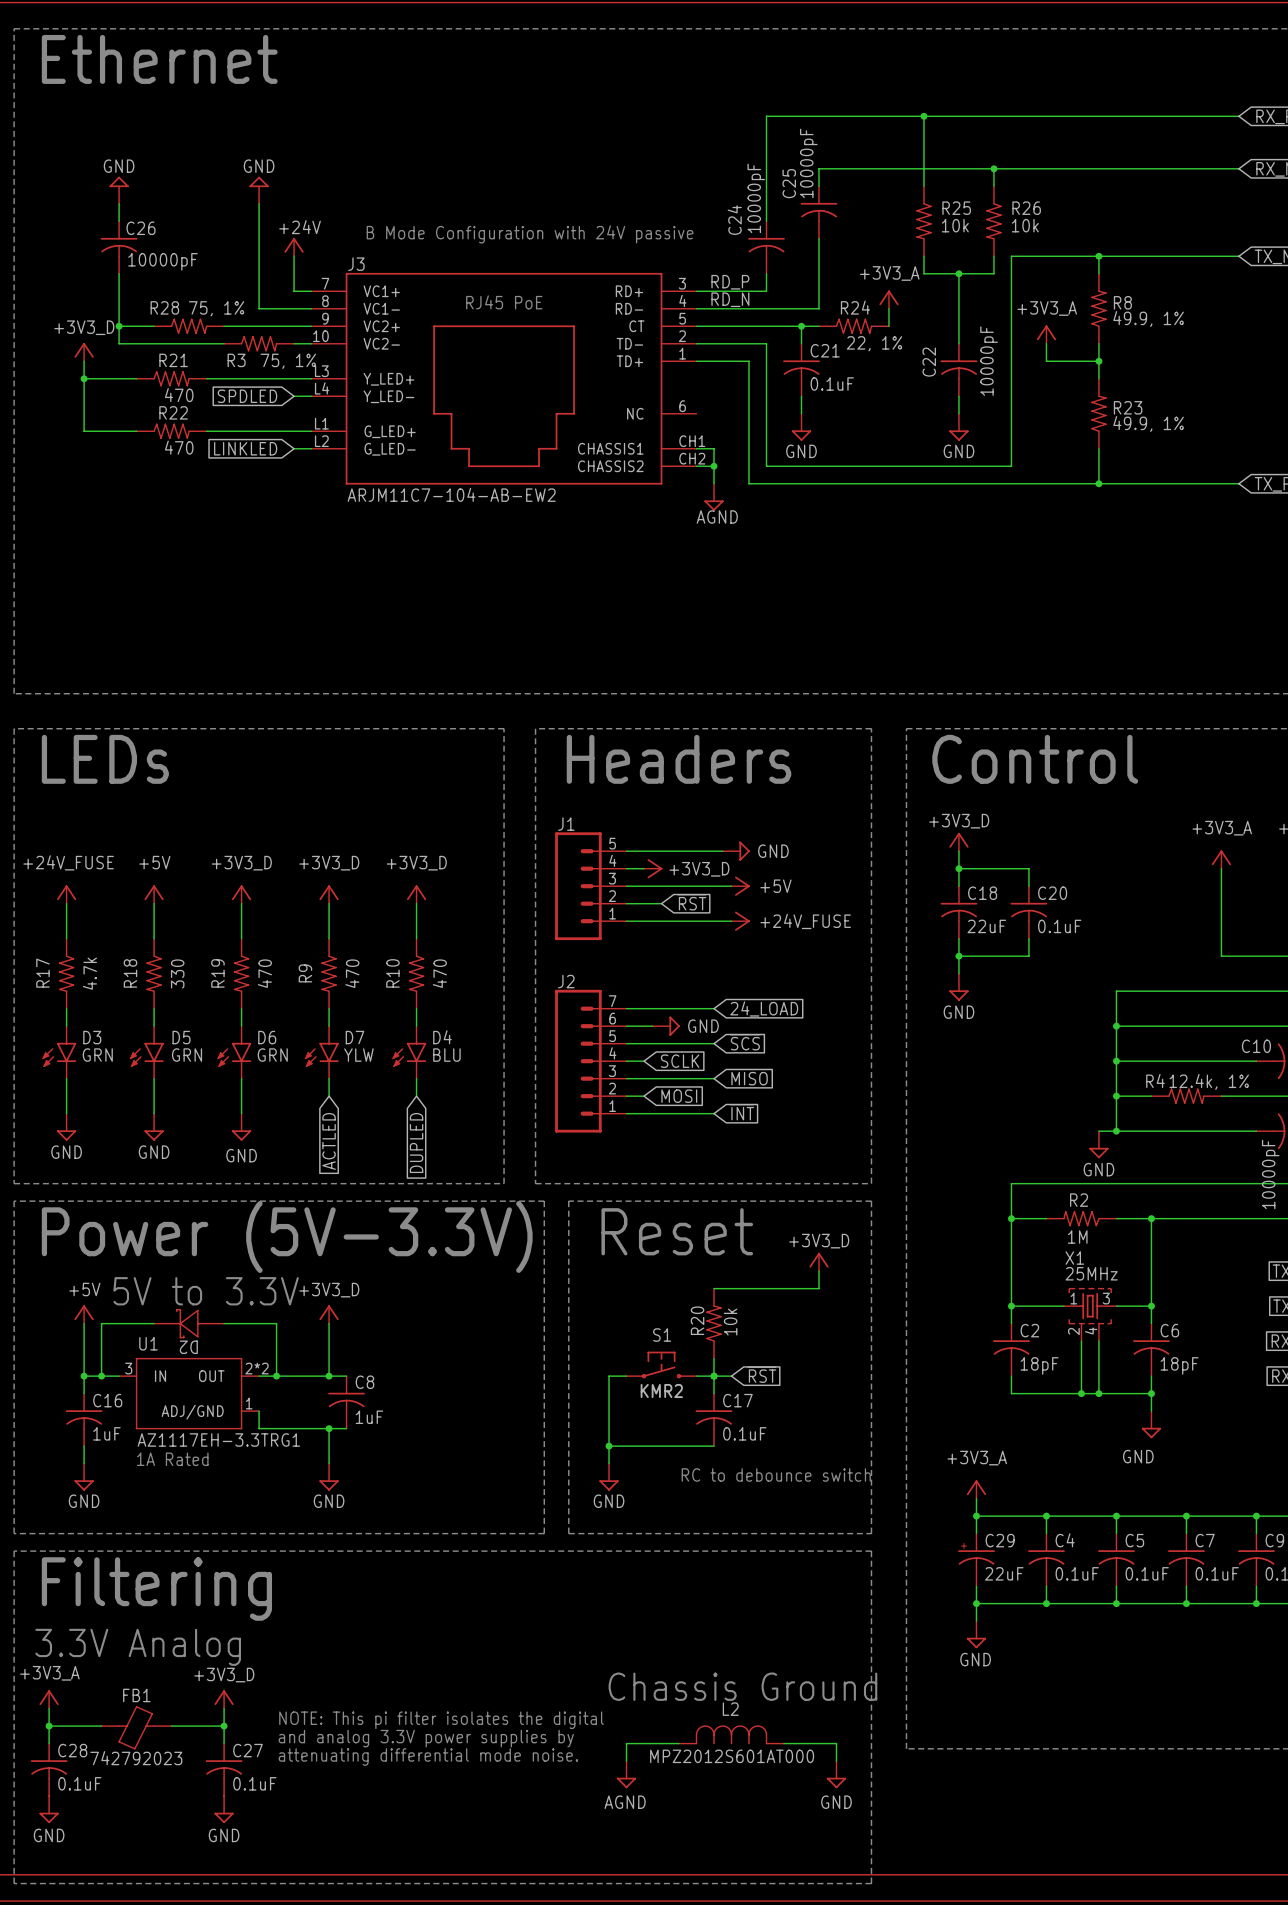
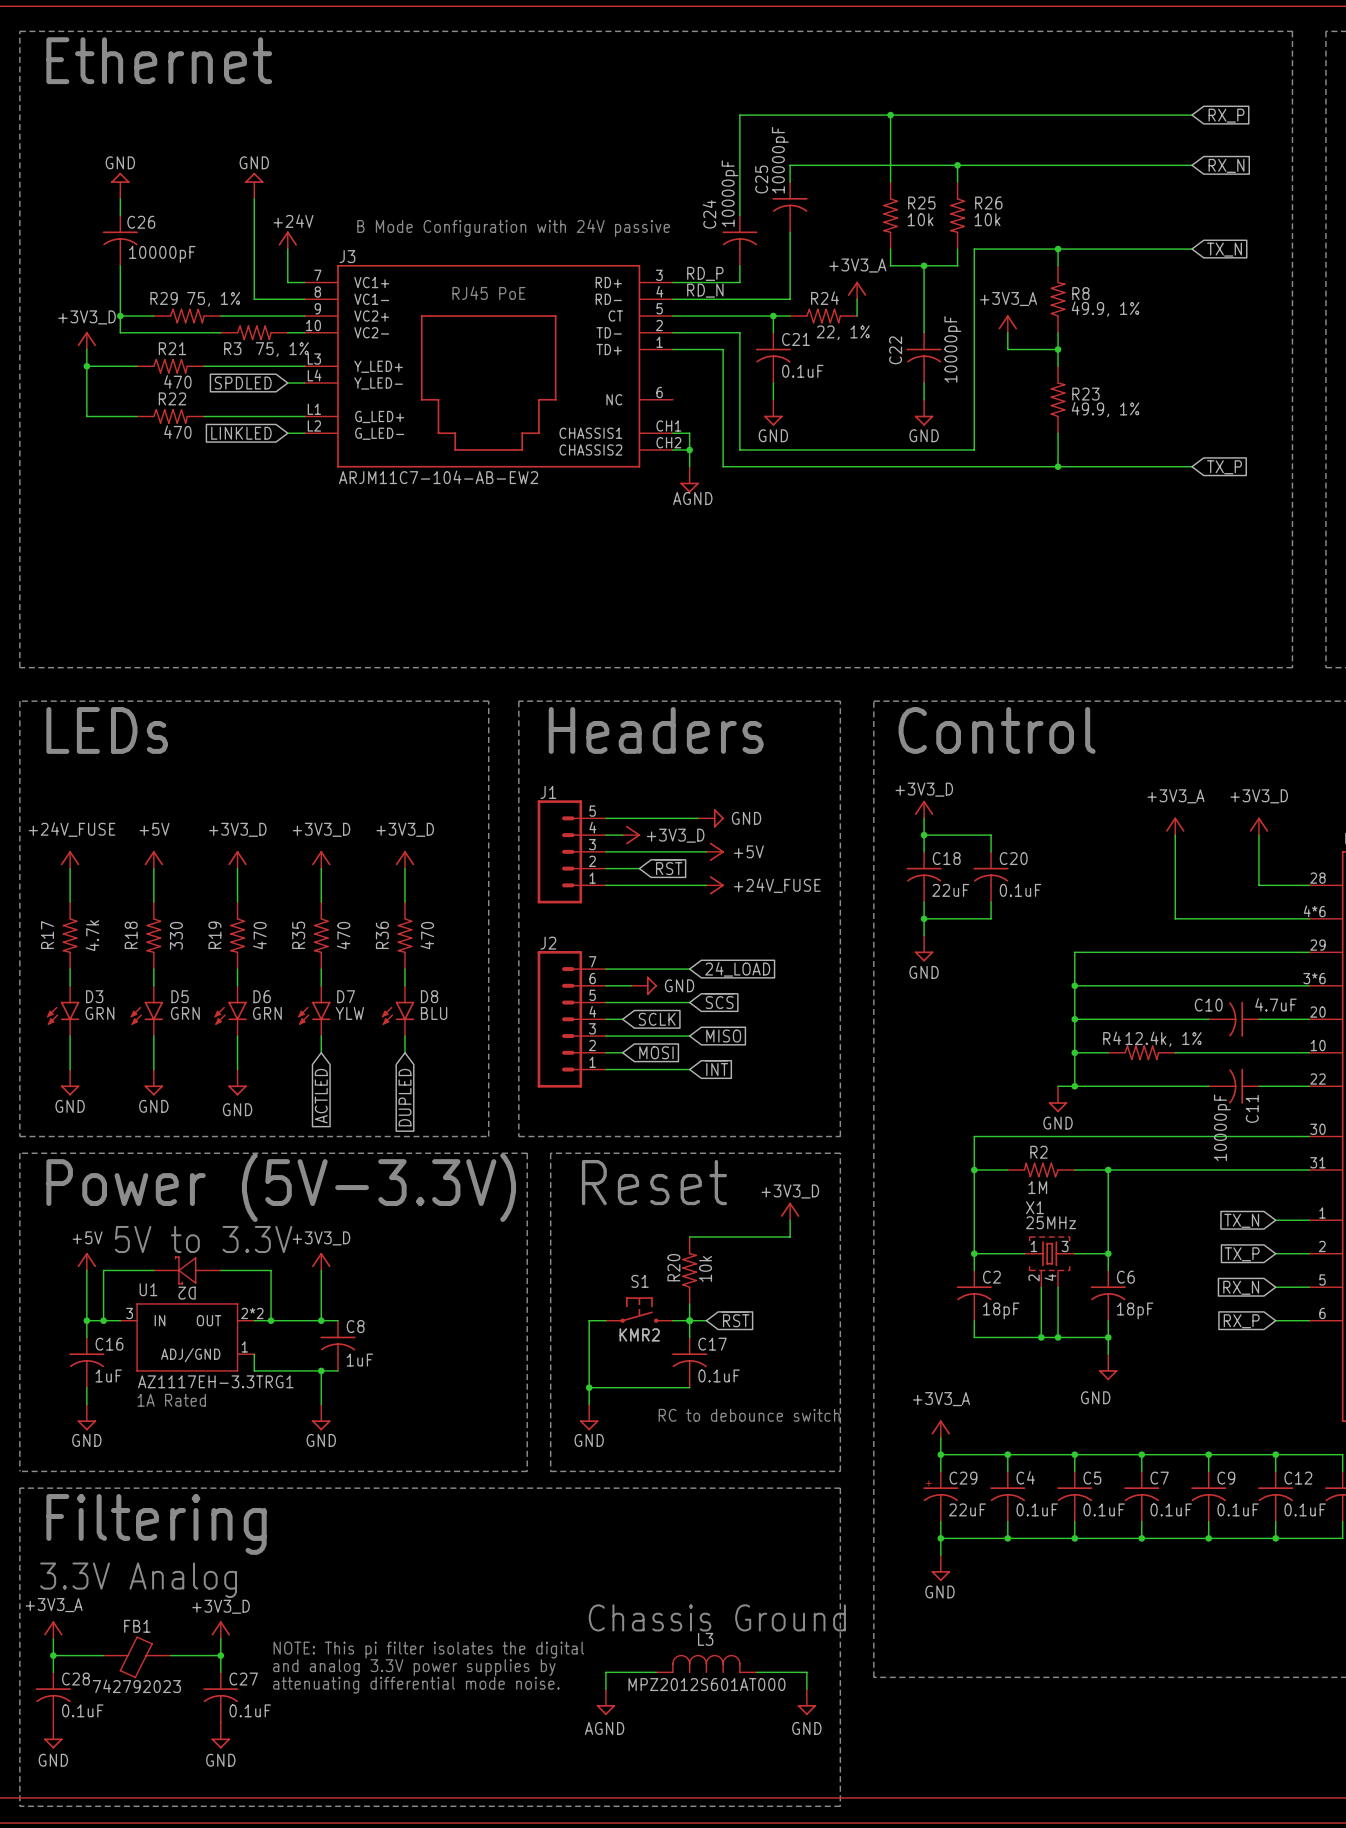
R28 name: R28 (164, 307) -> R29 (164, 298)
R9 name: R9 (305, 973) -> R35 (298, 935)
R10 name: R10 (392, 973) -> R36 (382, 935)
D4 name: D4 (442, 1037) -> D8 (429, 996)
L2 name: L2 (730, 1709) -> L3 (705, 1639)

